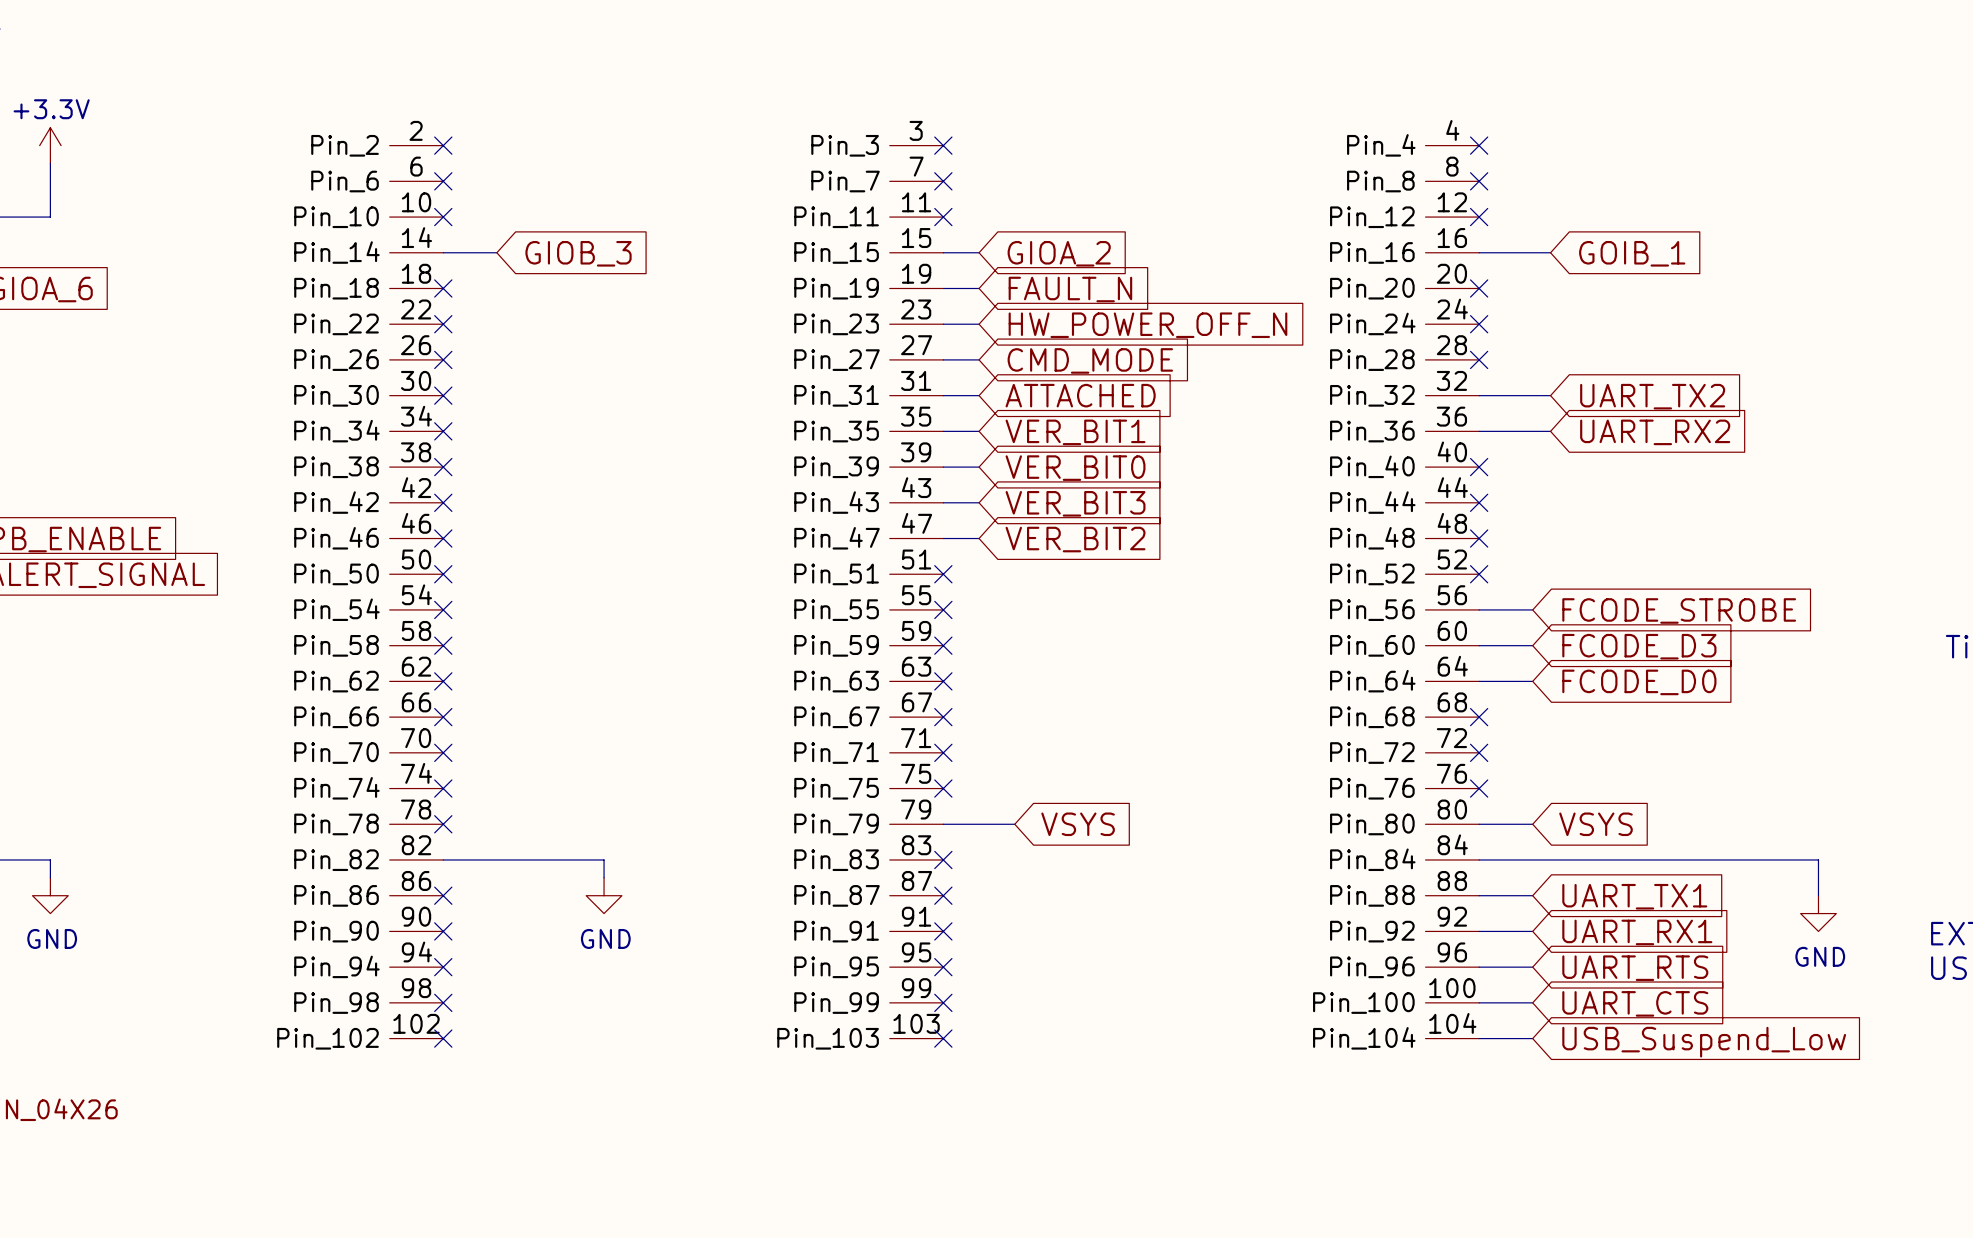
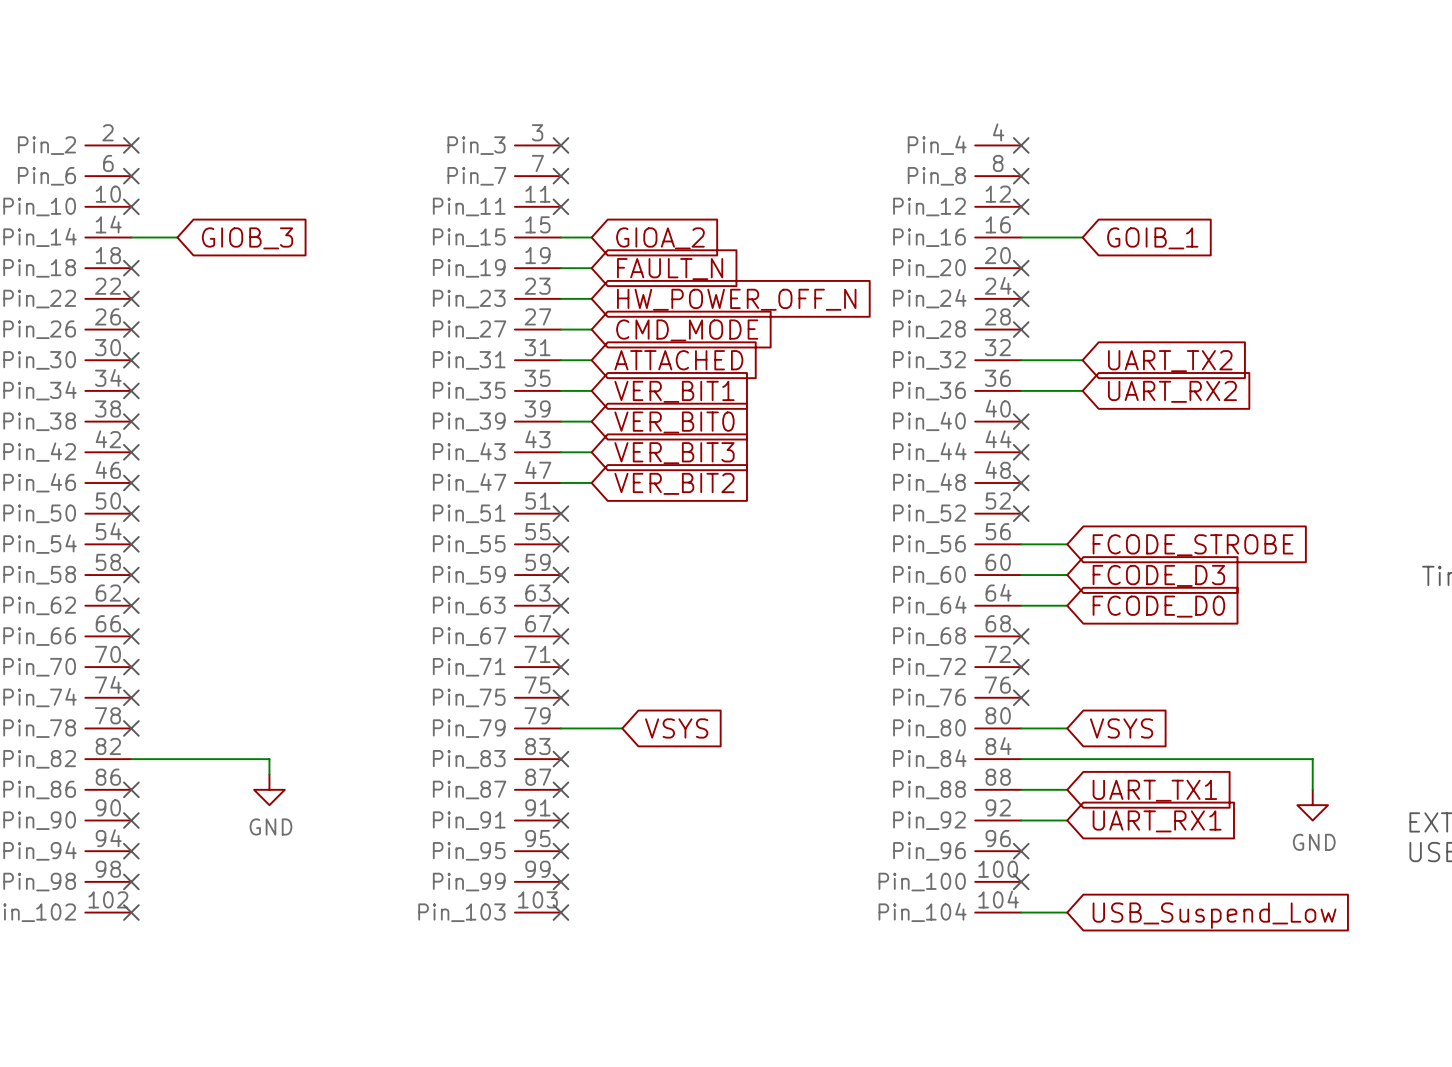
wire: (1479, 967) (1532, 967) -> none
no-connect mark: none -> (1021, 851)
global label: UART_RTS (1635, 968) -> none
wire: (1479, 1002) (1532, 1002) -> none
no-connect mark: none -> (1021, 881)
global label: UART_CTS (1635, 1003) -> none

